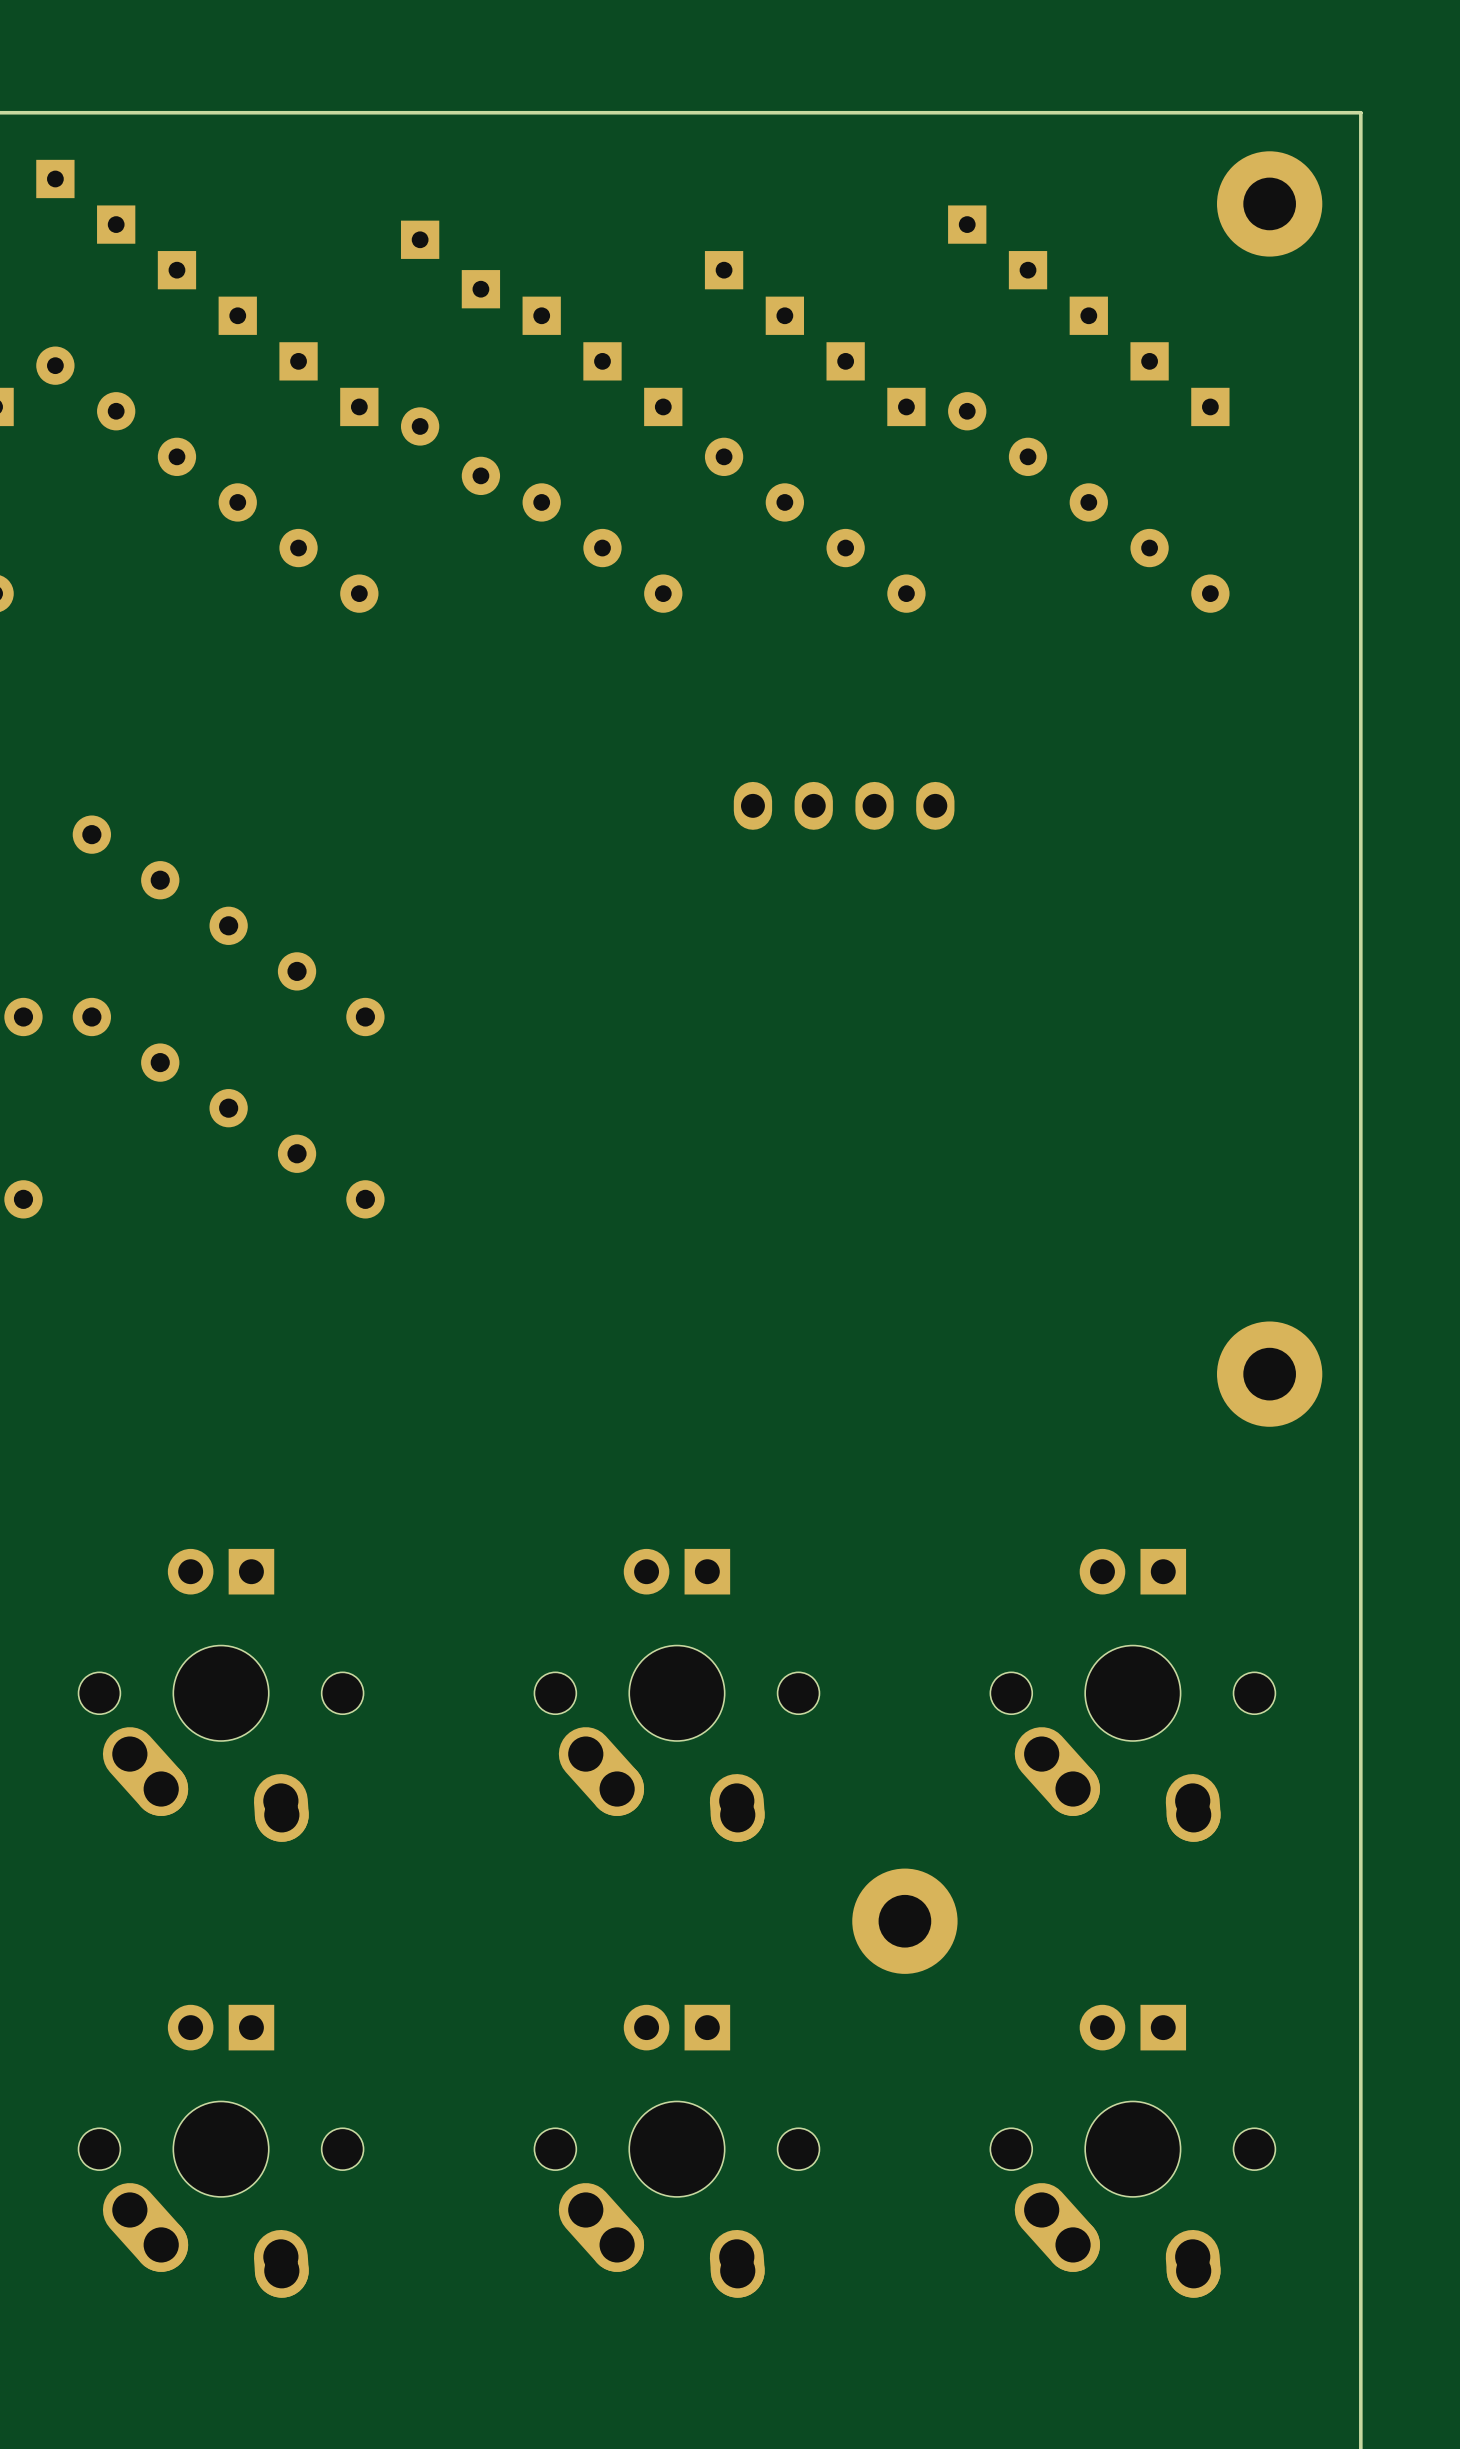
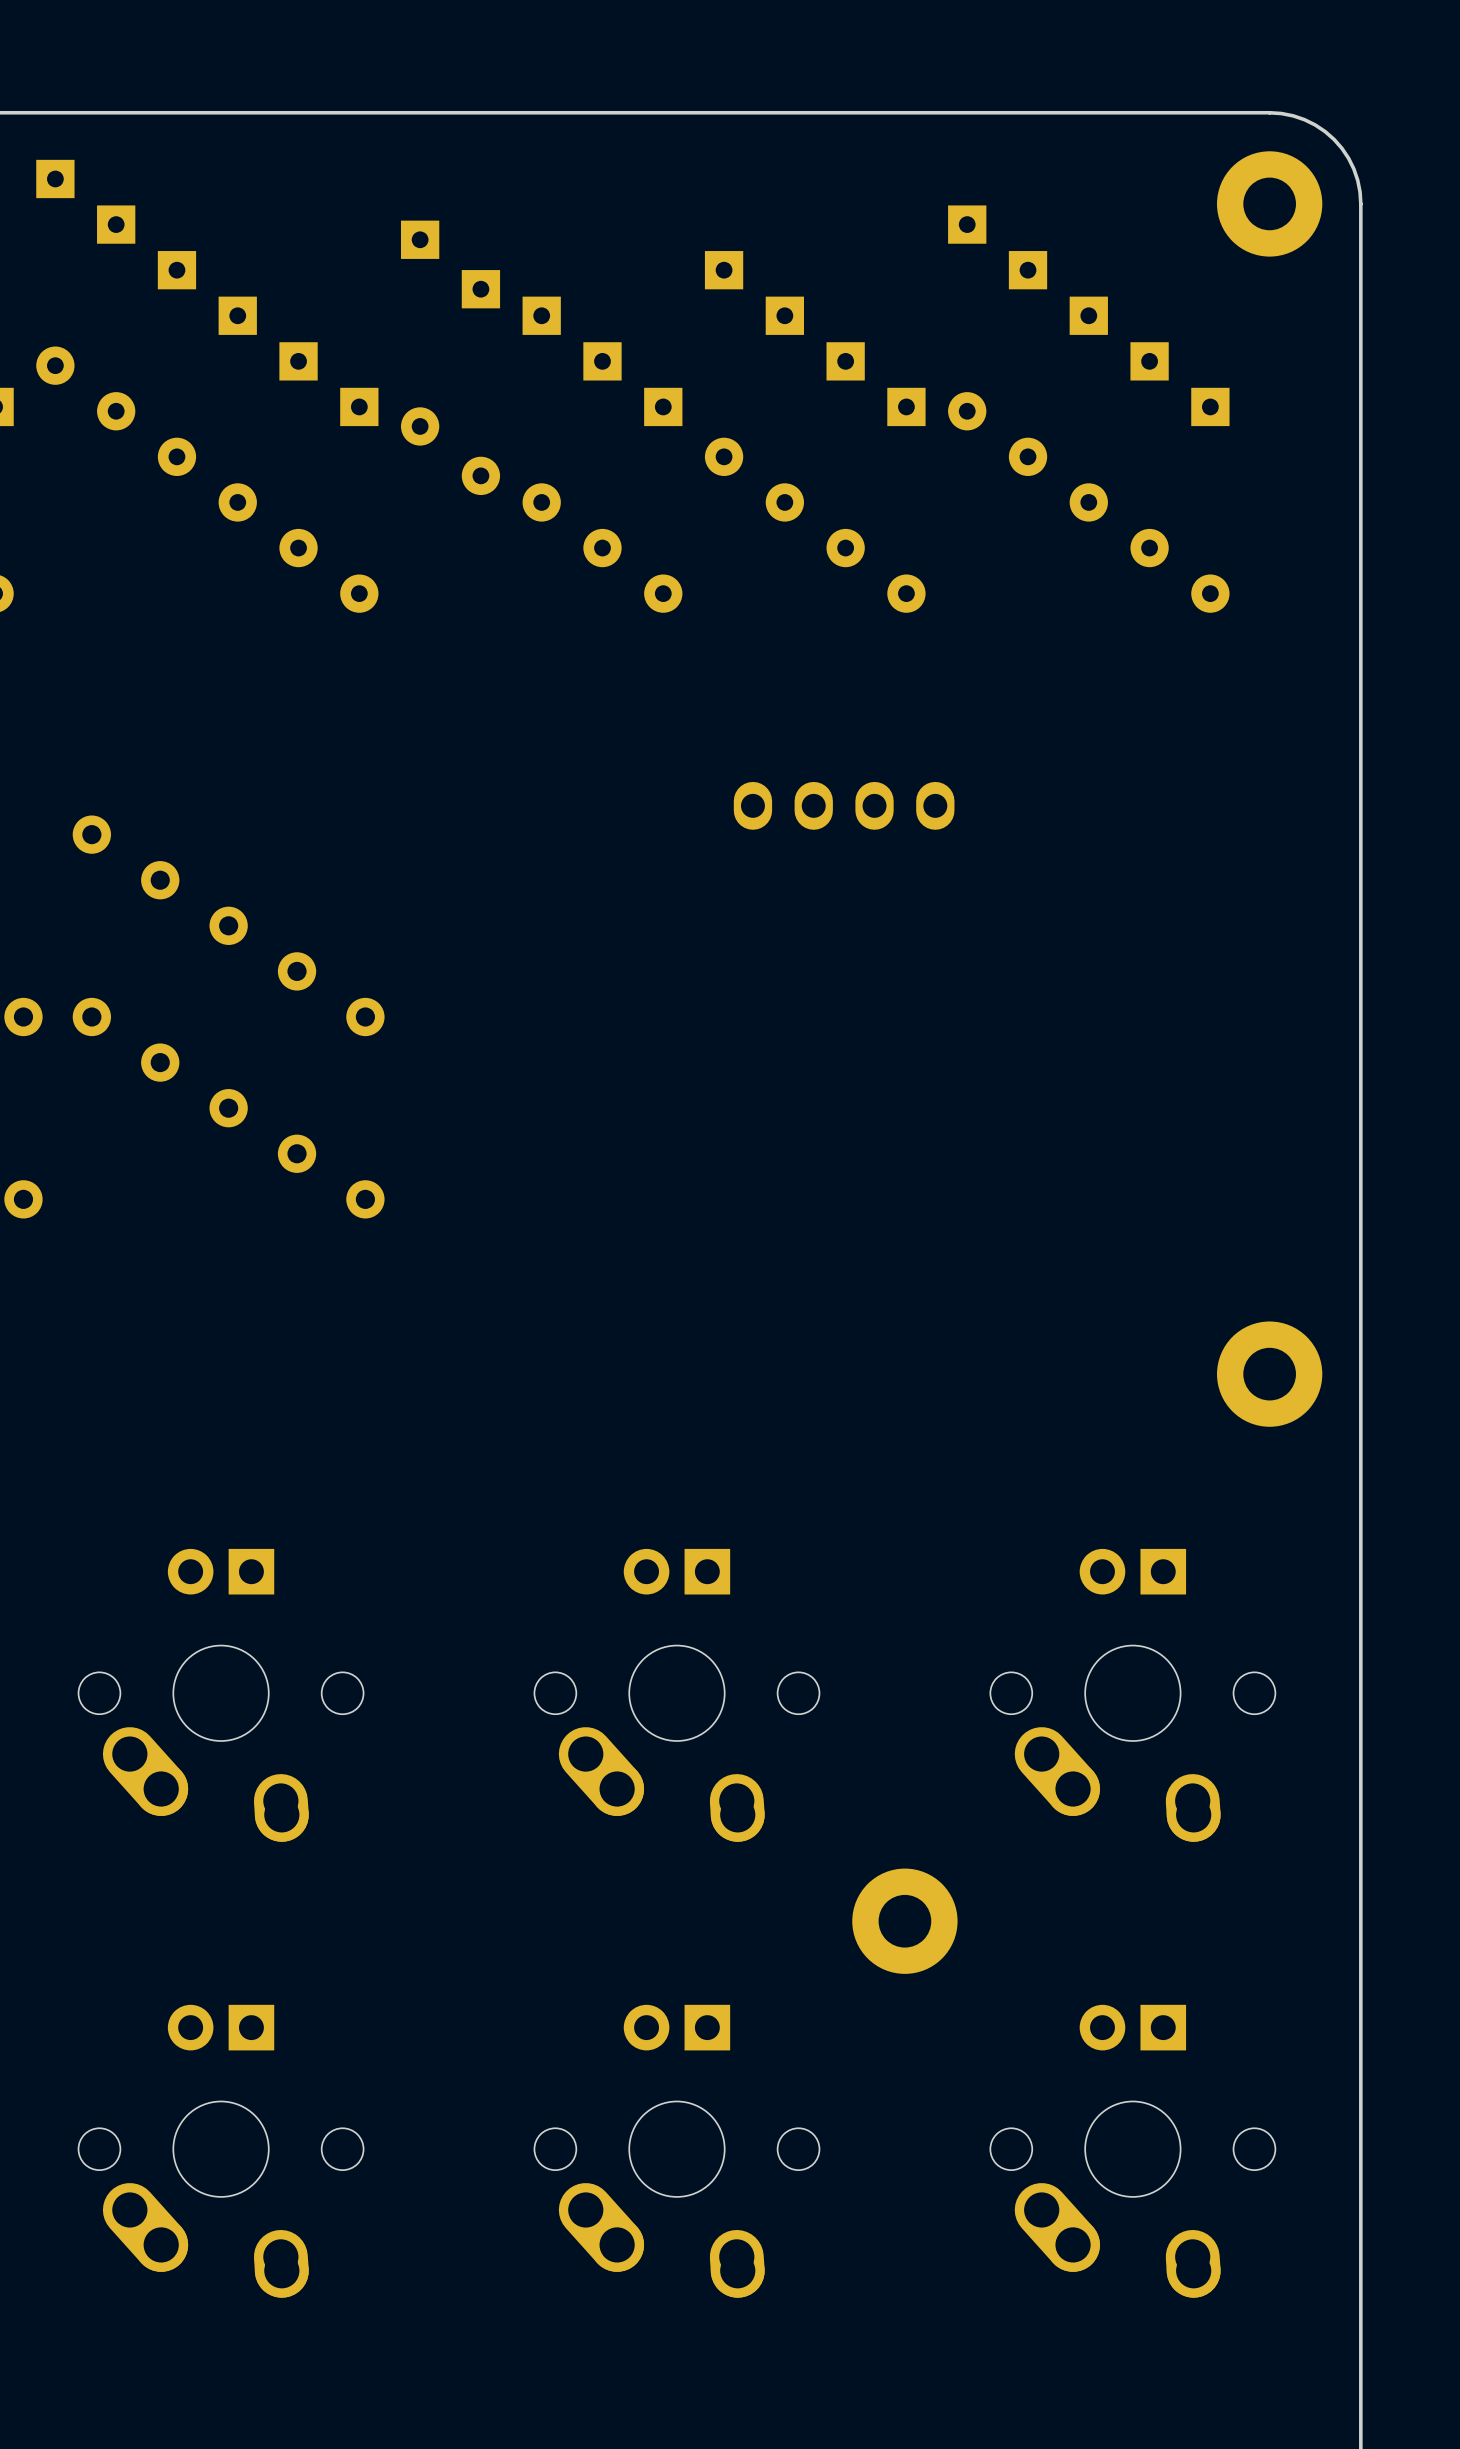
board edge: (1269, 112) (1360, 112) (1360, 203) -> (1269, 112) (1293, 115) (1304, 119) (1325, 131) (1334, 139) (1341, 148) (1353, 169) (1357, 180) (1360, 203)

